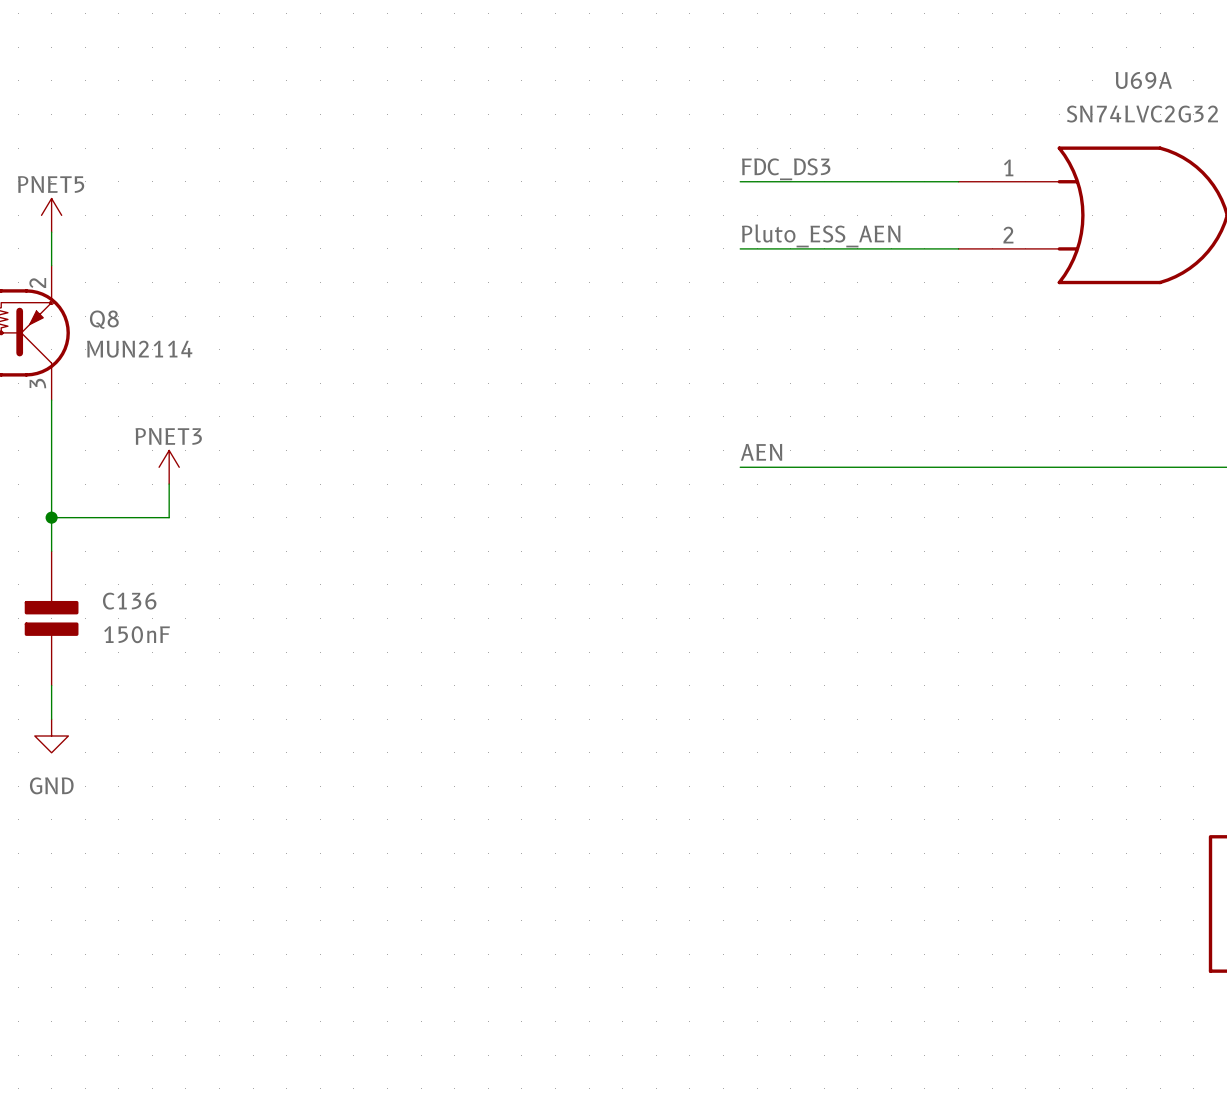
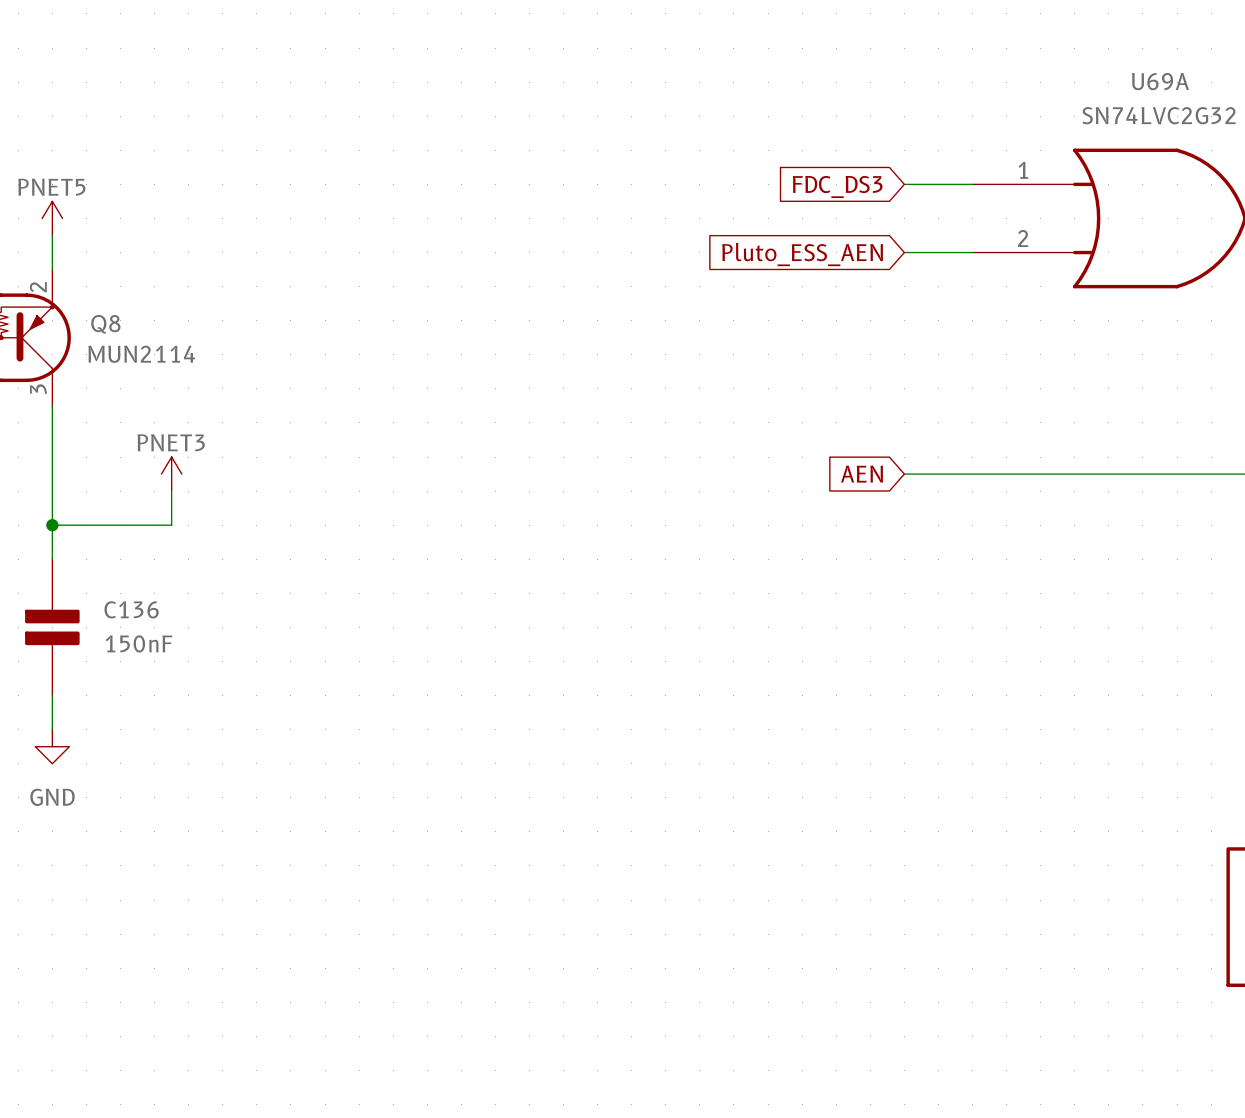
label: FDC_DS3 (786, 169) -> none
wire: (740, 181) (891, 181) -> none
global label: none -> FDC_DS3 (837, 186)
label: Pluto_ESS_AEN (821, 235) -> none
wire: (740, 248) (891, 248) -> none
global label: none -> Pluto_ESS_AEN (802, 254)
label: AEN (761, 452) -> none
wire: (740, 467) (891, 467) -> none
global label: none -> AEN (861, 474)

